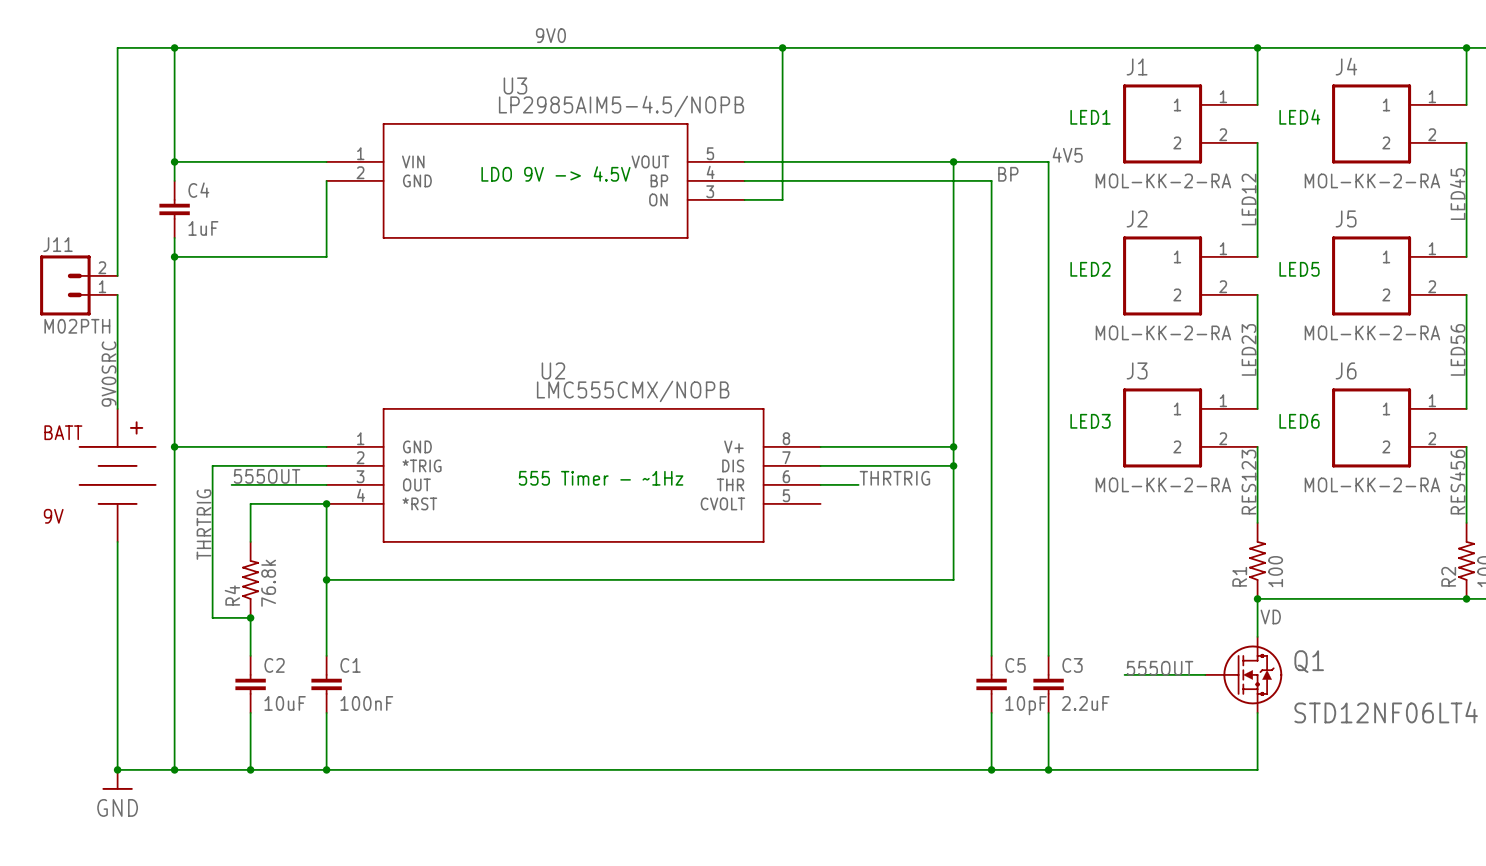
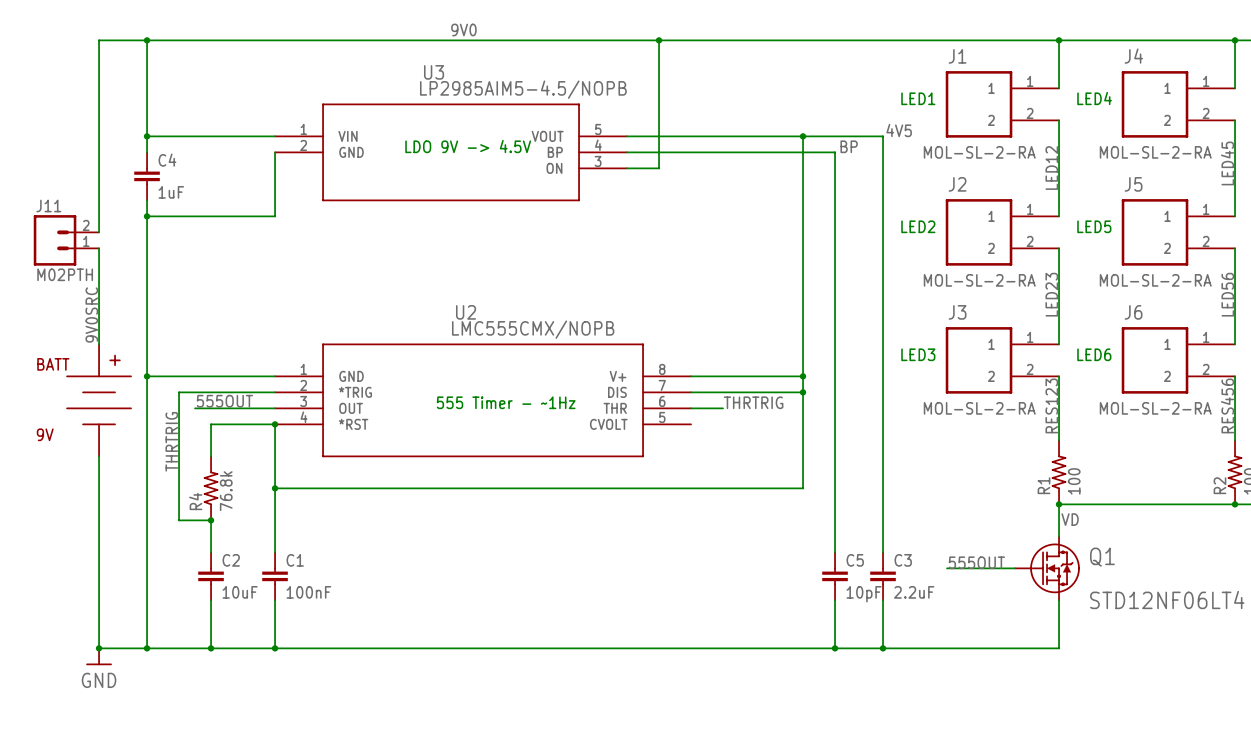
J1 value: MOL-KK-2-RA (1163, 180) -> MOL-SL-2-RA (979, 152)
J4 value: MOL-KK-2-RA (1372, 180) -> MOL-SL-2-RA (1155, 152)
J2 value: MOL-KK-2-RA (1163, 332) -> MOL-SL-2-RA (979, 280)
J5 value: MOL-KK-2-RA (1372, 332) -> MOL-SL-2-RA (1155, 280)
J3 value: MOL-KK-2-RA (1163, 484) -> MOL-SL-2-RA (979, 408)
J6 value: MOL-KK-2-RA (1372, 484) -> MOL-SL-2-RA (1155, 408)

